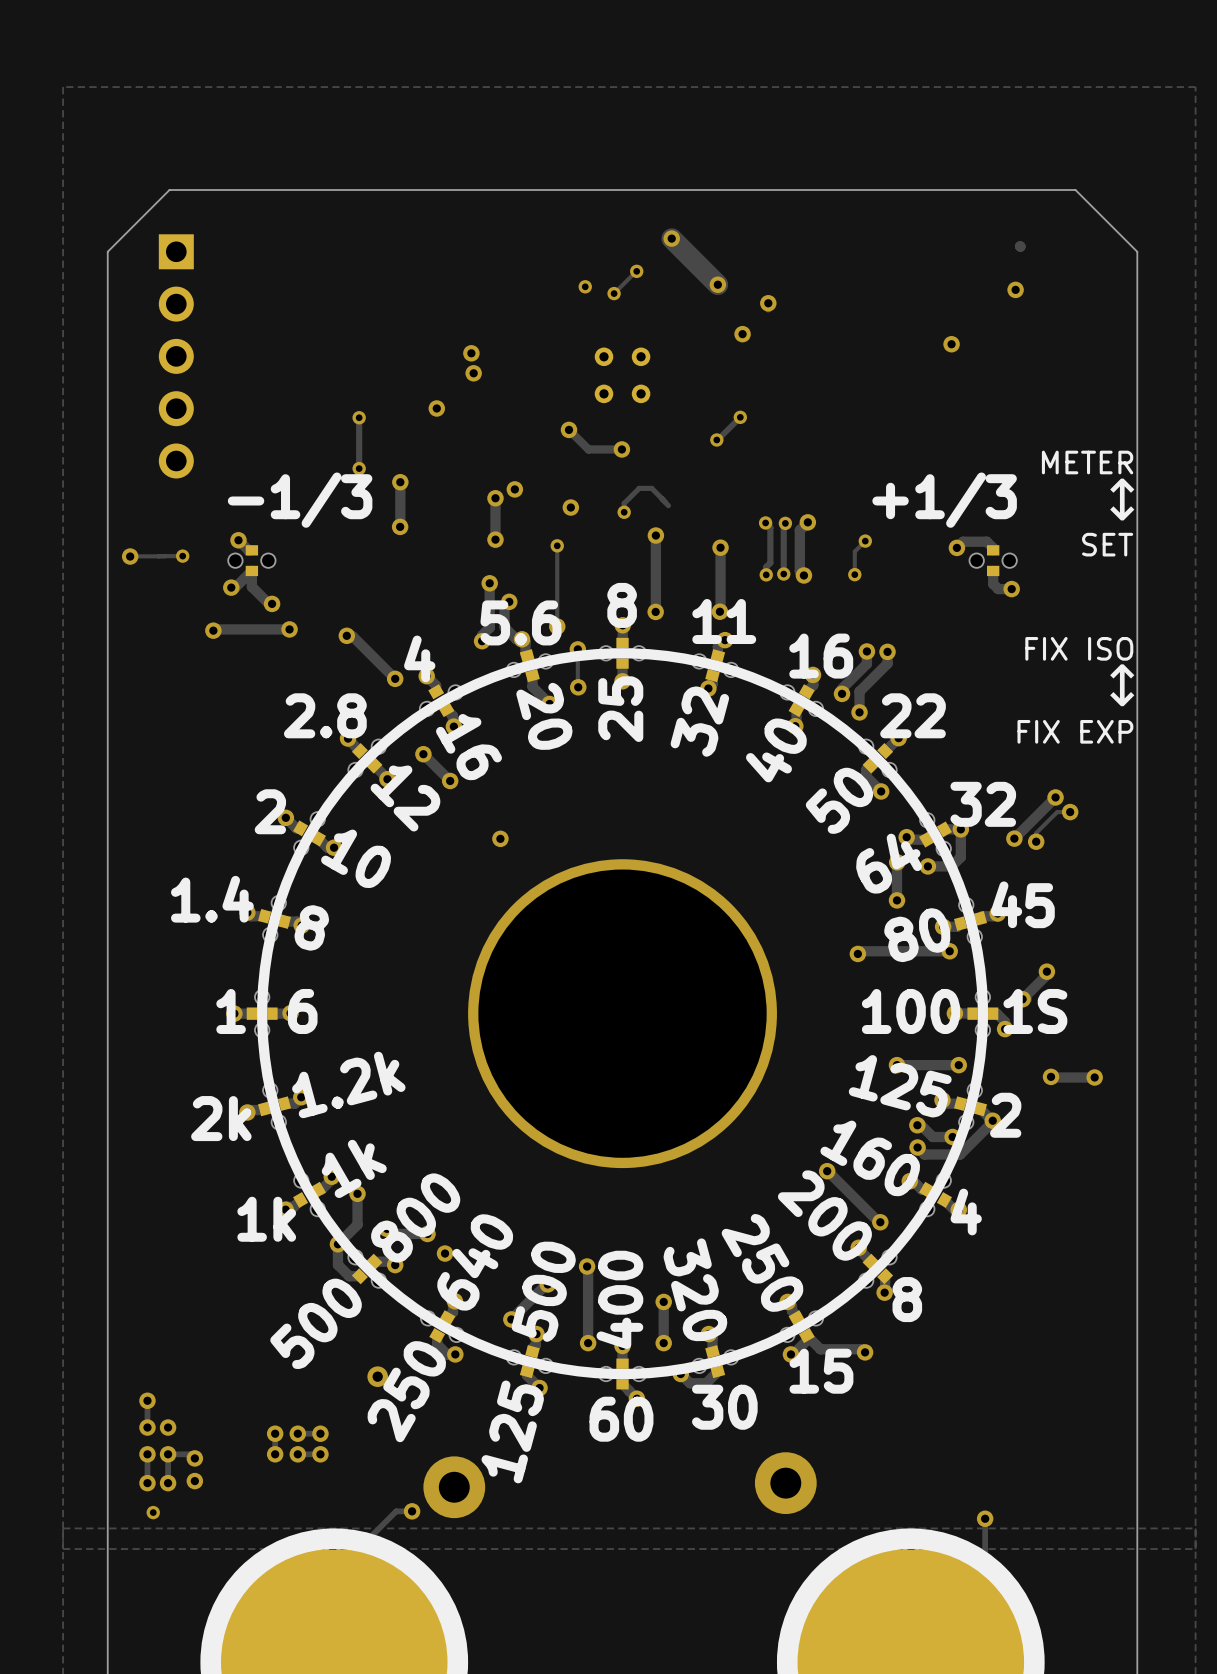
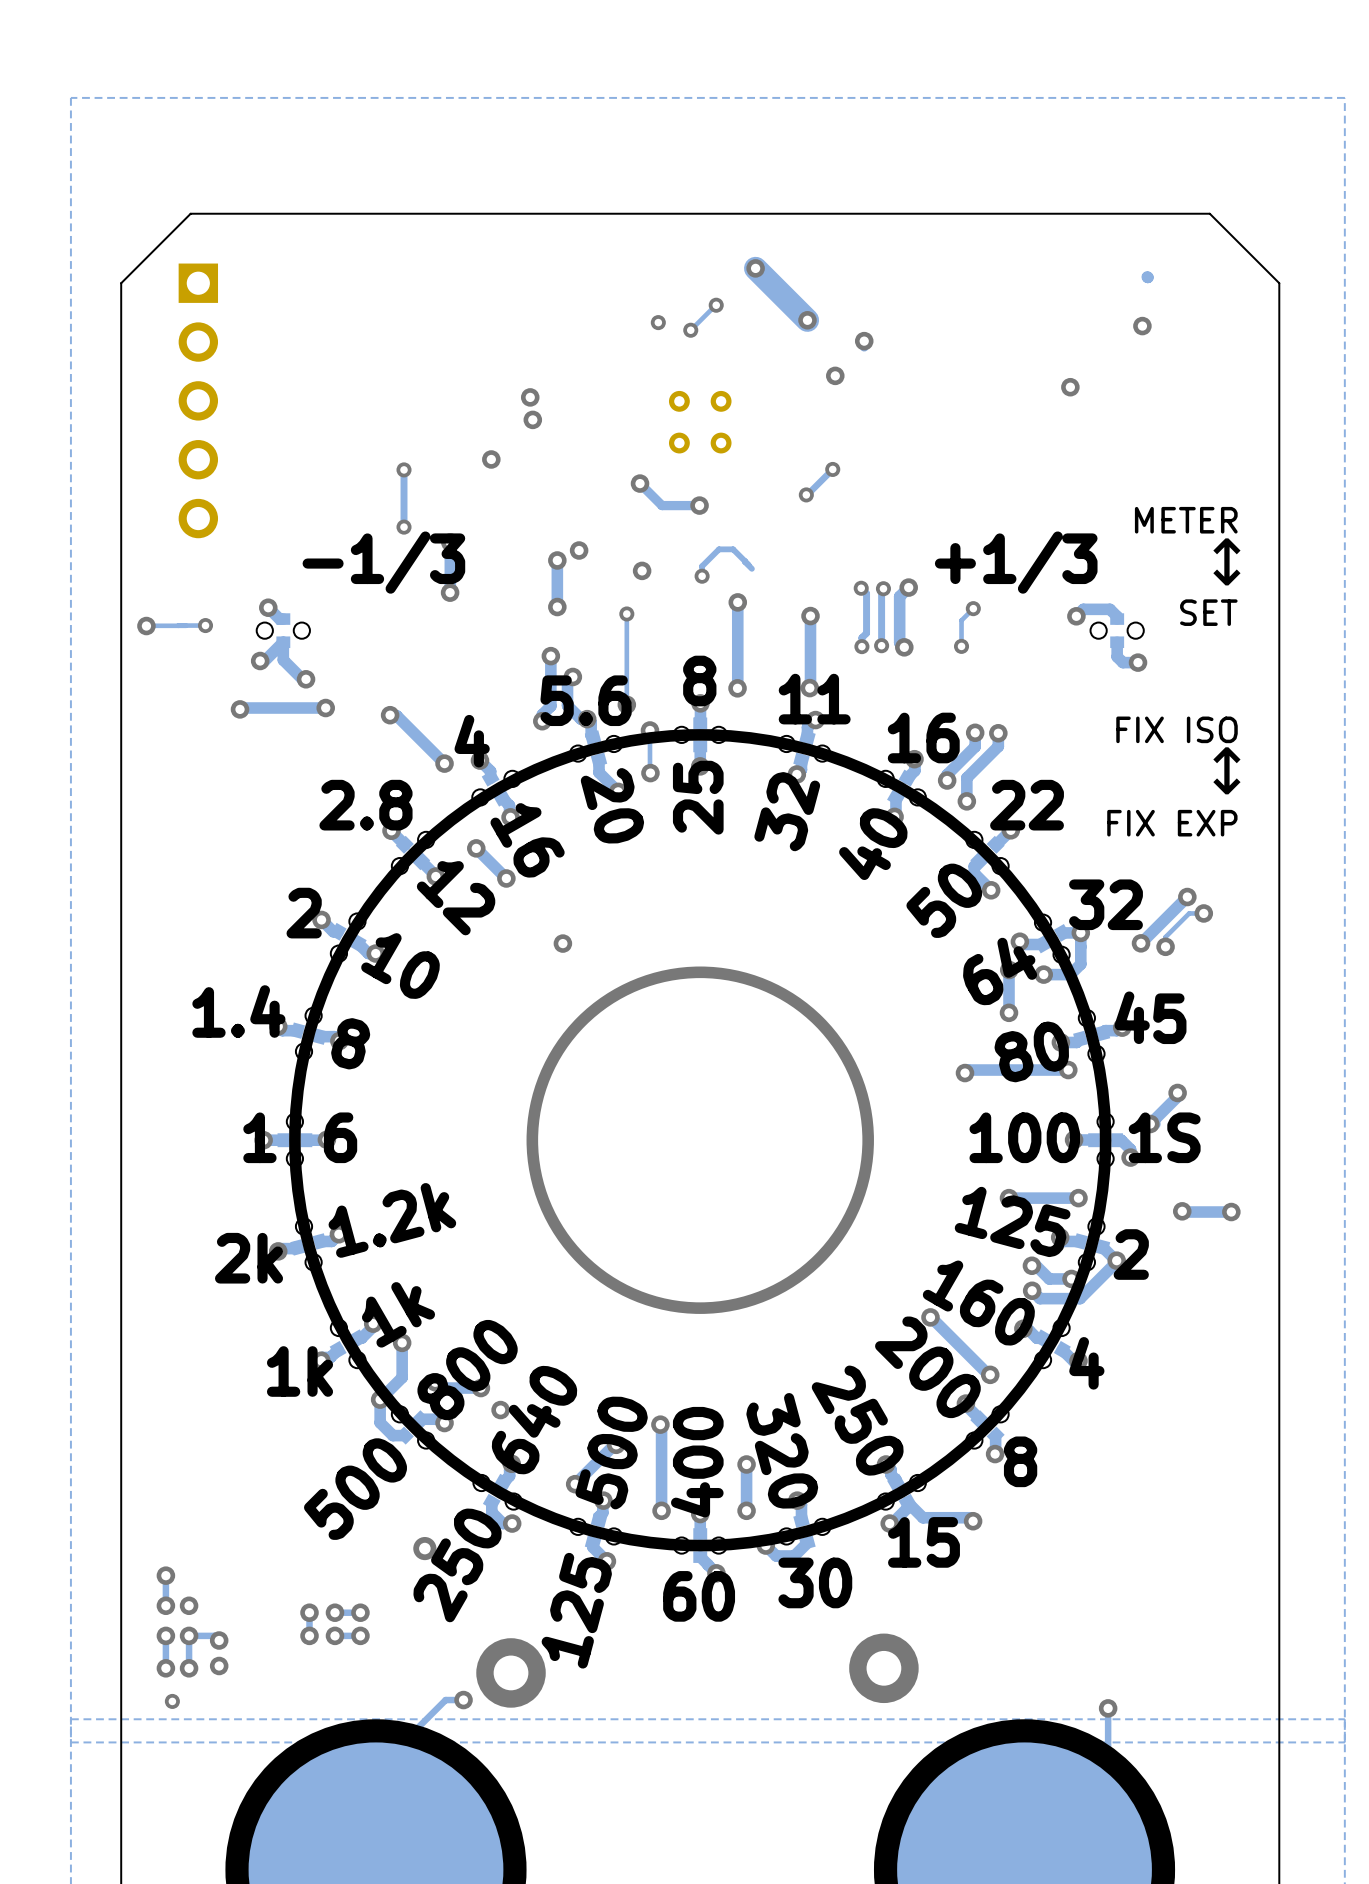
text position: METER (1087, 462) -> METER (1186, 520)
text position: ↕ (1122, 499) -> ↕ (1226, 561)
text position: -1/3 (300, 500) -> -1/3 (383, 562)
text position: +1/3 (944, 500) -> +1/3 (1016, 562)
text position: SET (1107, 544) -> SET (1208, 612)
text position: FIX ISO (1079, 648) -> FIX ISO (1177, 729)
text position: ↕ (1122, 685) -> ↕ (1226, 770)
text position: FIX EXP (1075, 731) -> FIX EXP (1172, 823)

